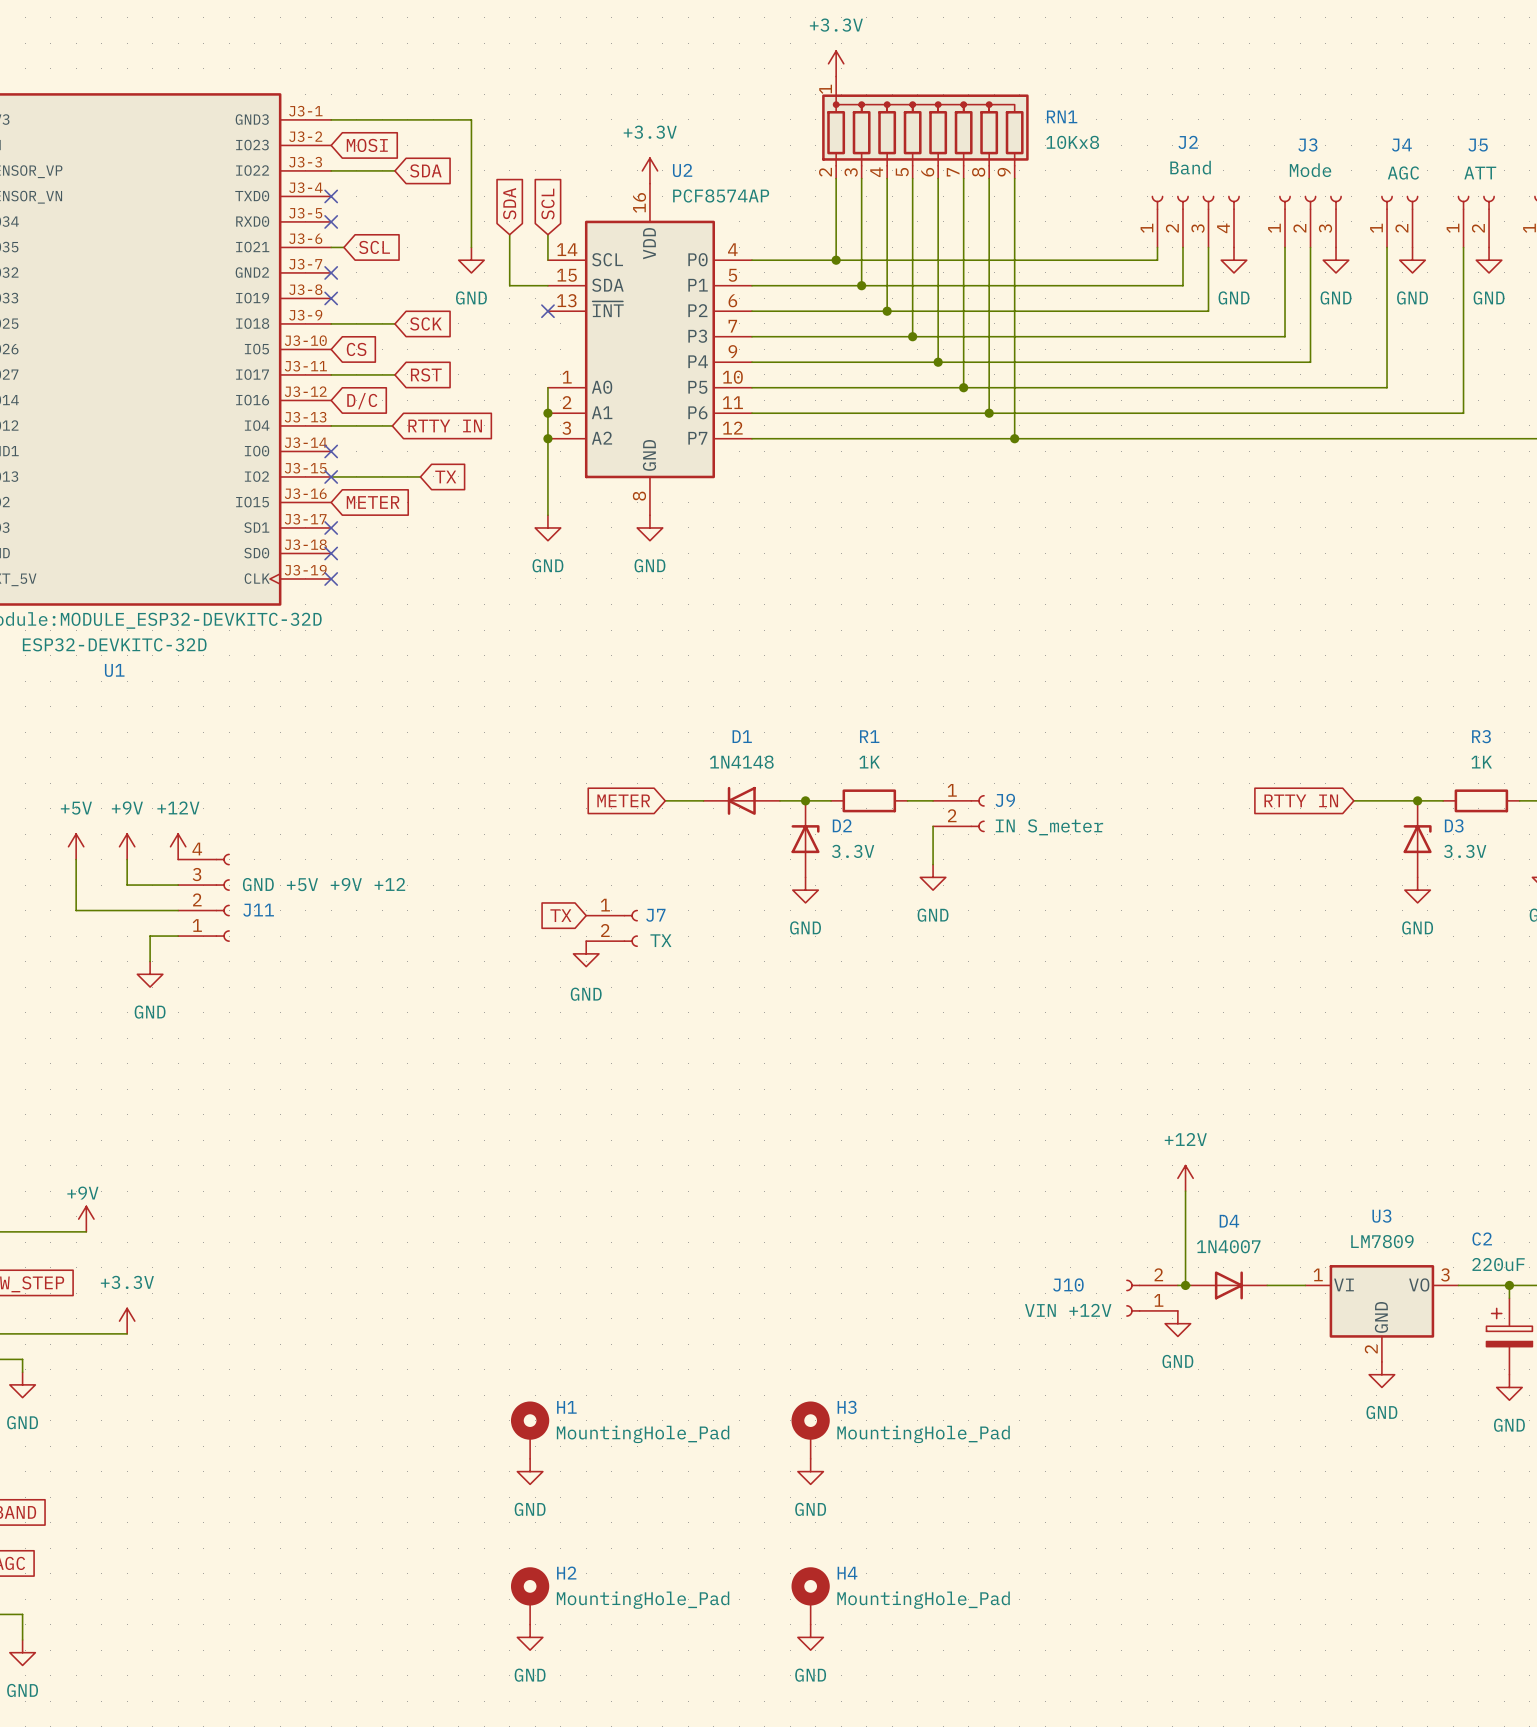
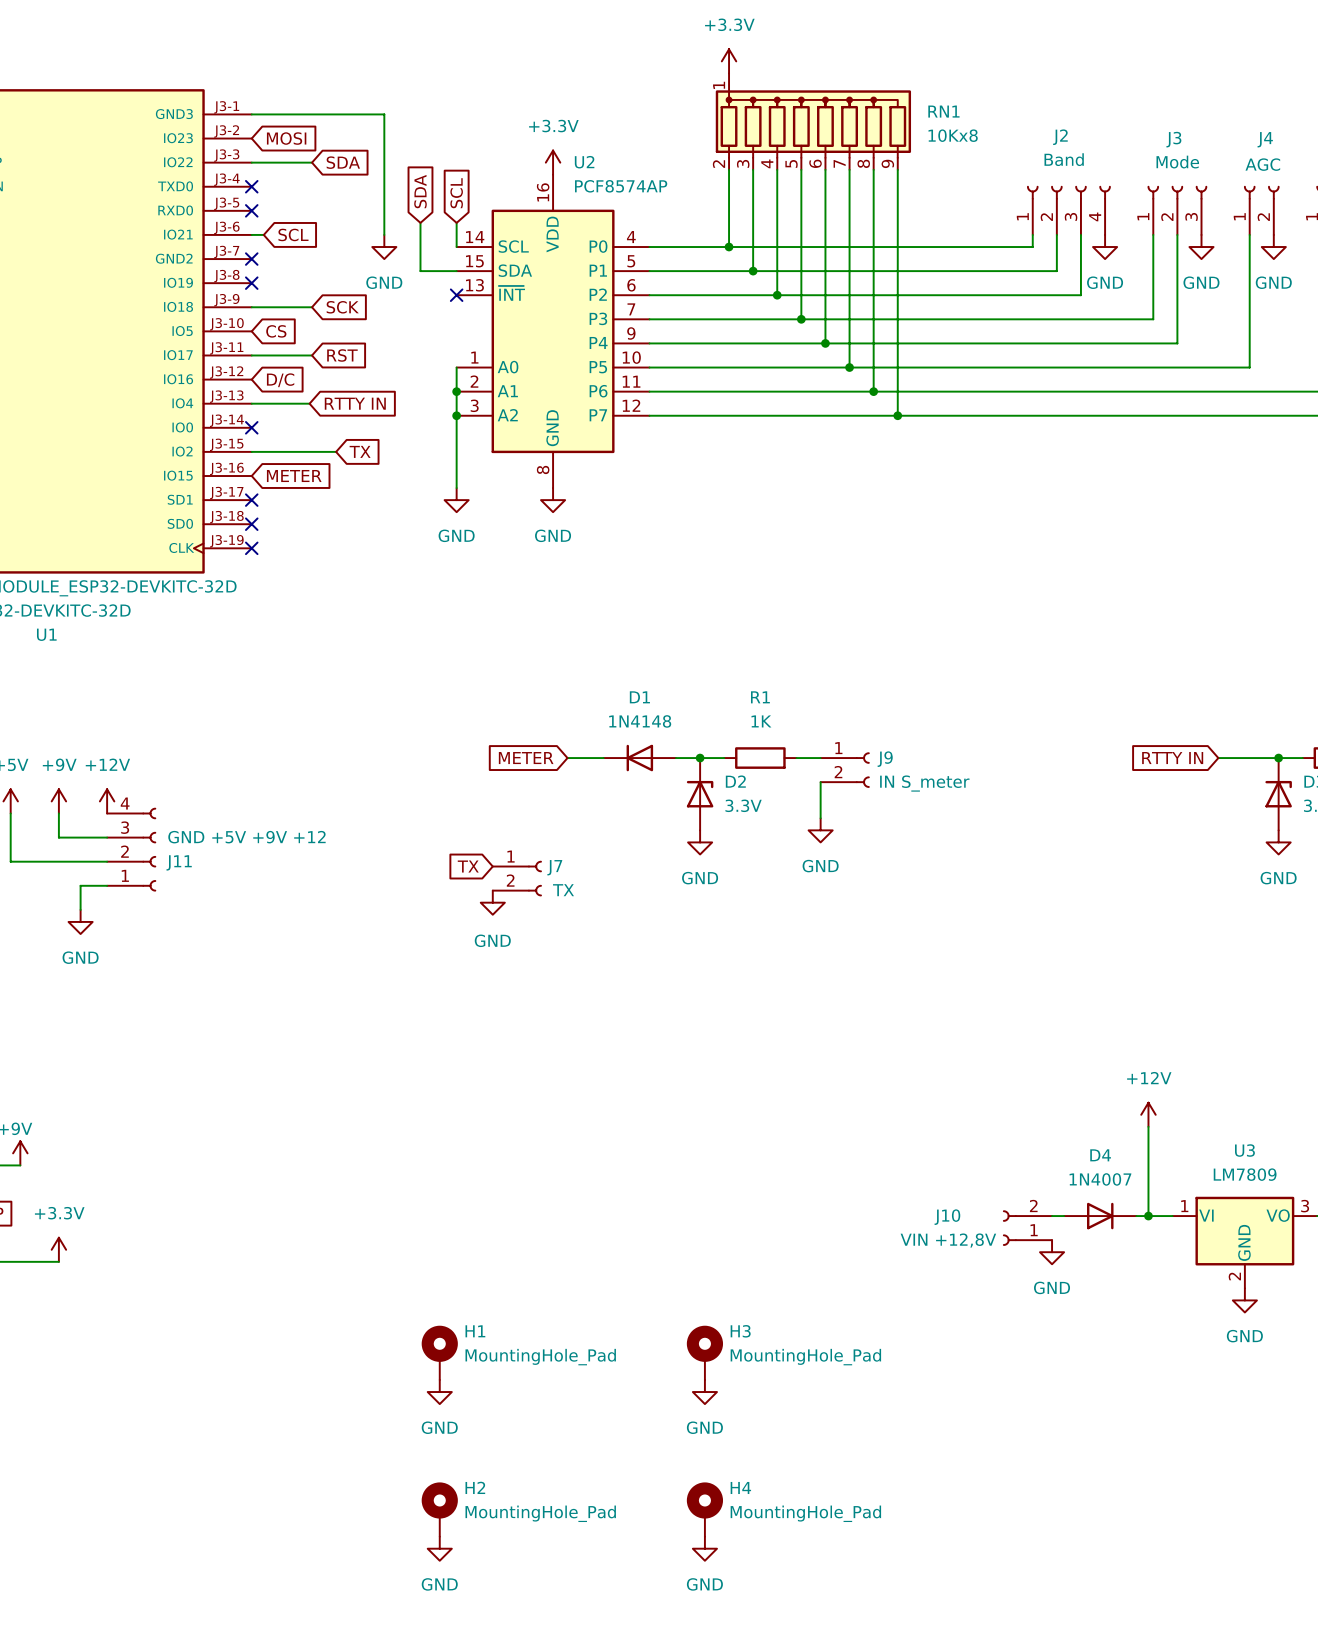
no-connect mark: (331, 476) -> none
power symbol position: +12V (1185, 1178) -> +12V (1148, 1114)
wire: (1185, 1191) (1185, 1285) -> (1148, 1126) (1148, 1216)
junction: (1185, 1285) -> none
junction: none -> (1148, 1216)
J10 value: VIN +12V (1068, 1310) -> VIN +12,8V (948, 1240)

